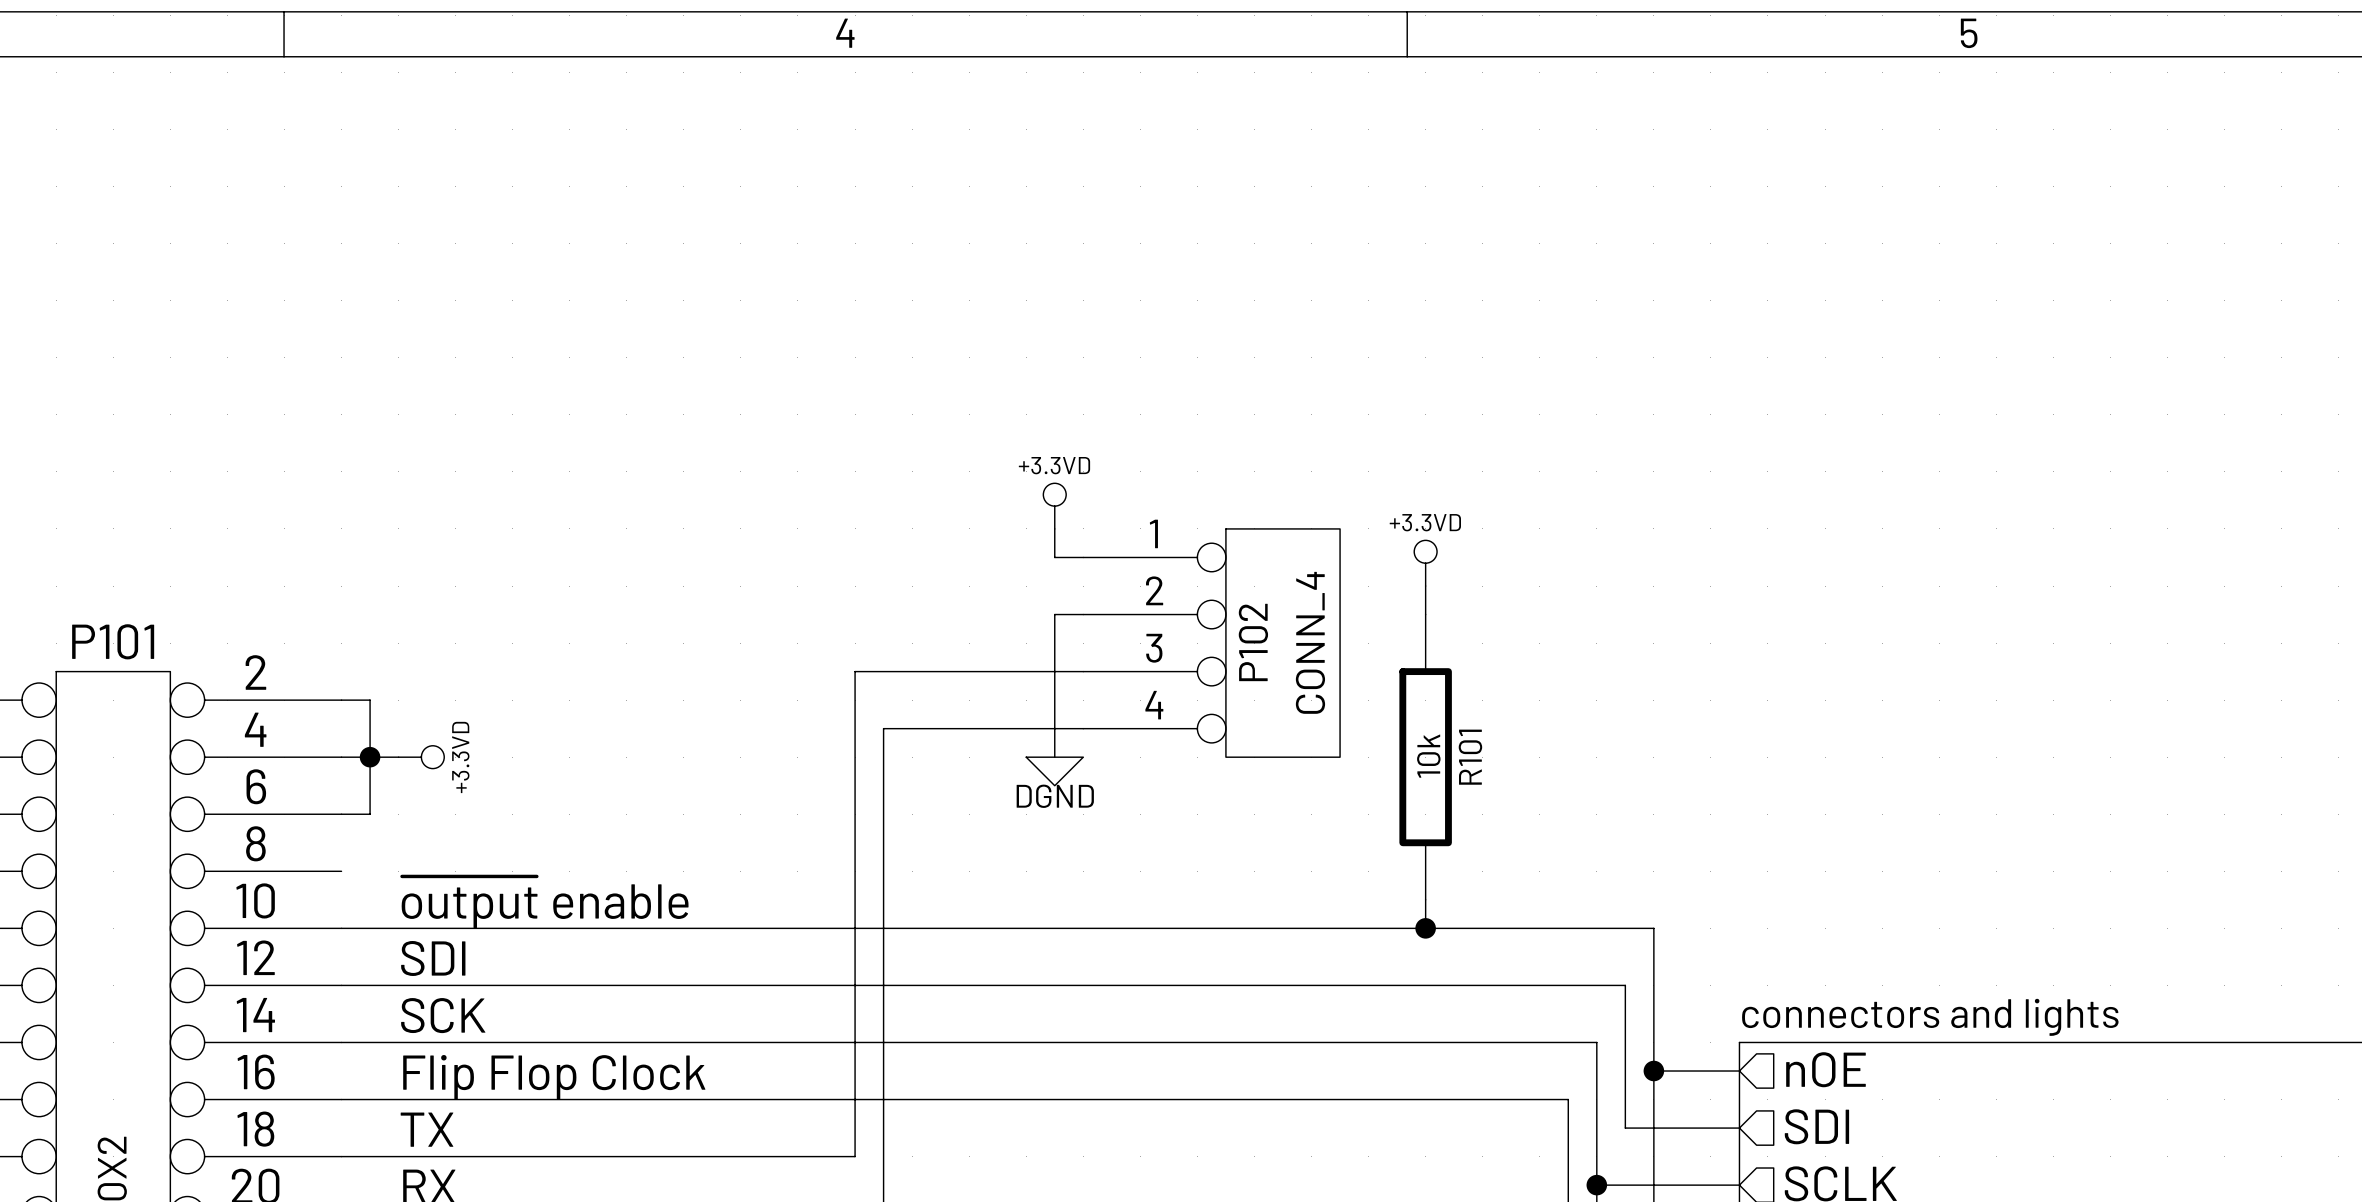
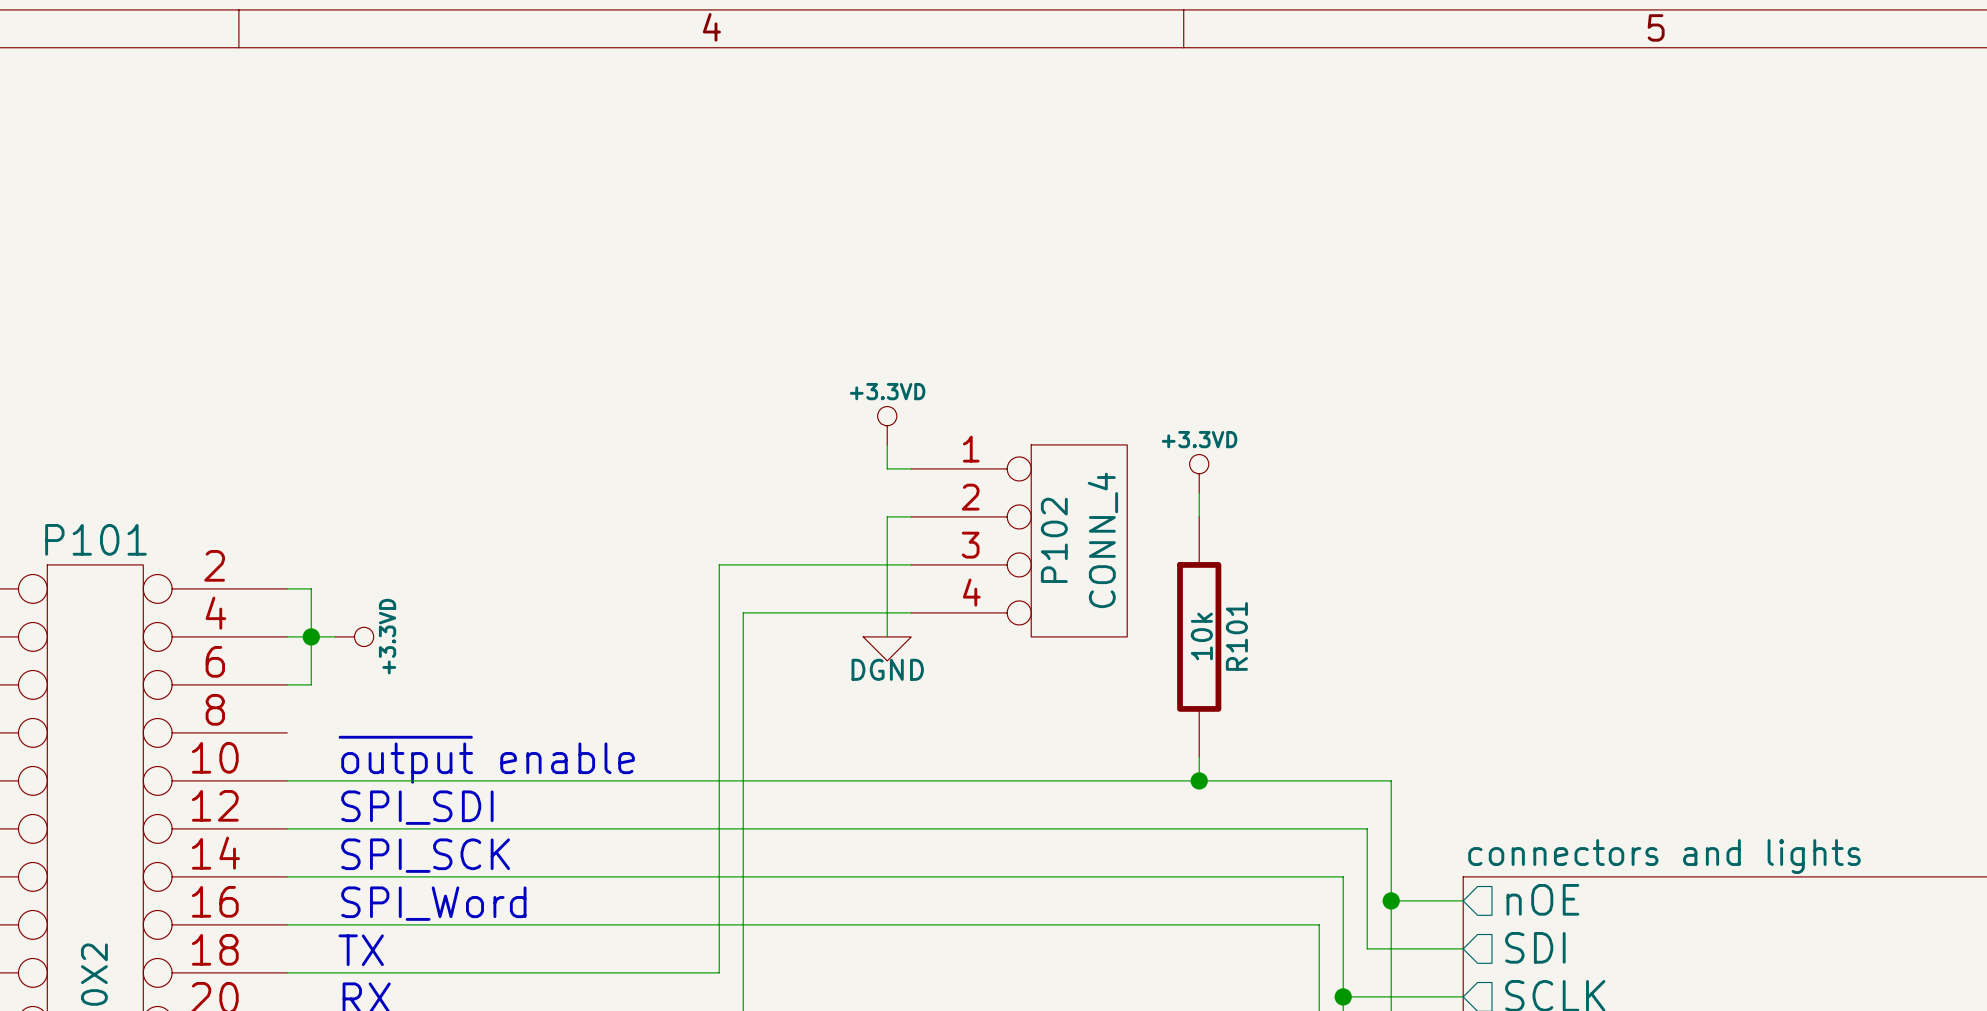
text: SDI (433, 958) -> SPI_SDI (417, 807)
text: SCK (443, 1015) -> SPI_SCK (425, 855)
text: Flip Flop Clock (554, 1077) -> SPI_Word (433, 903)

